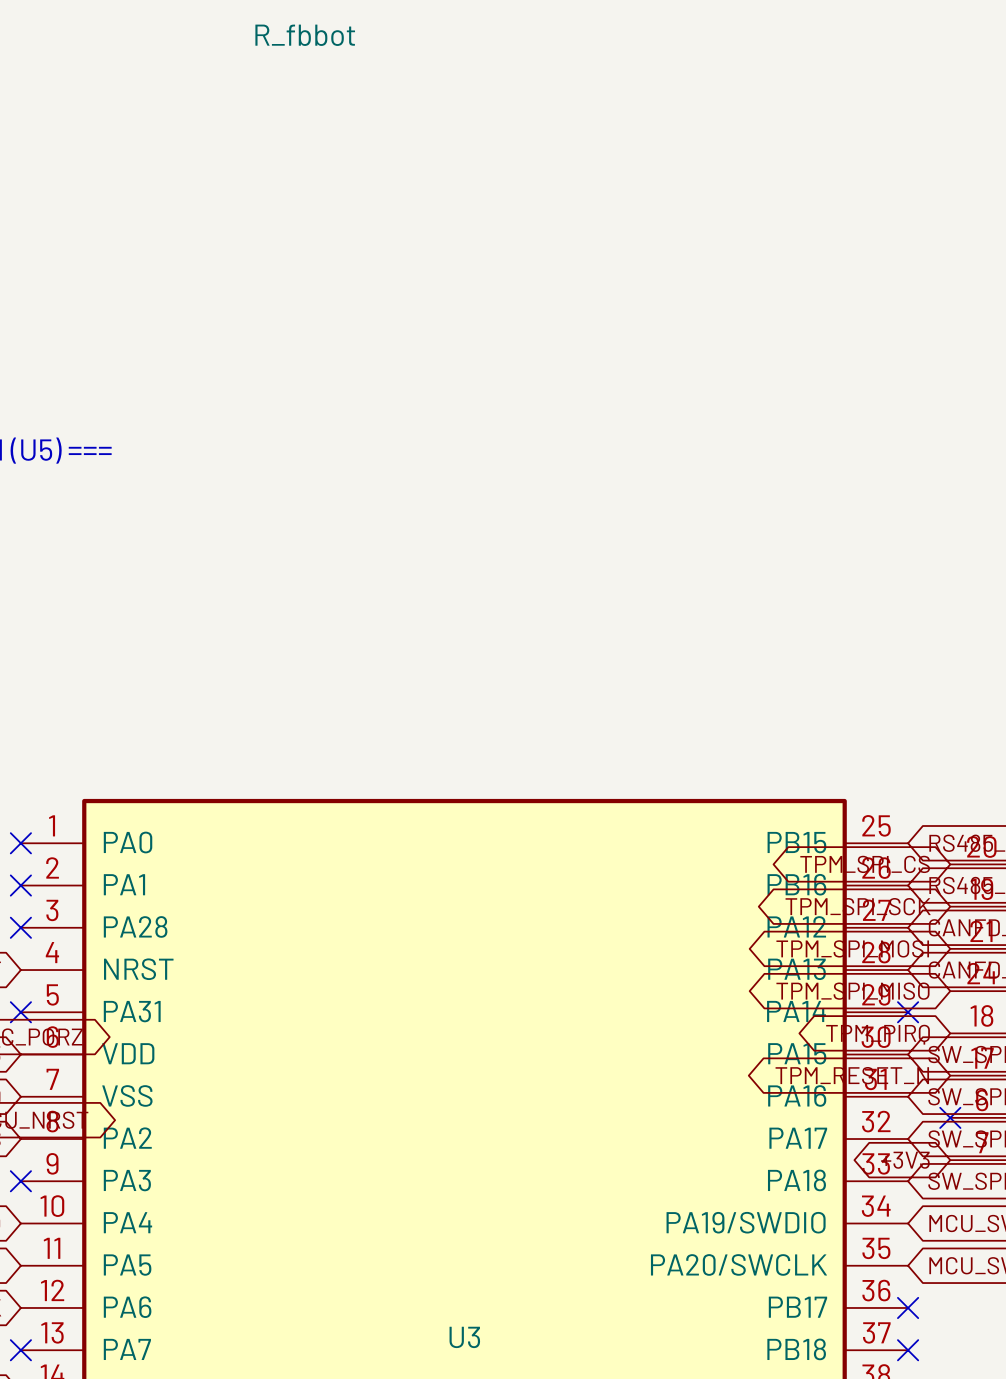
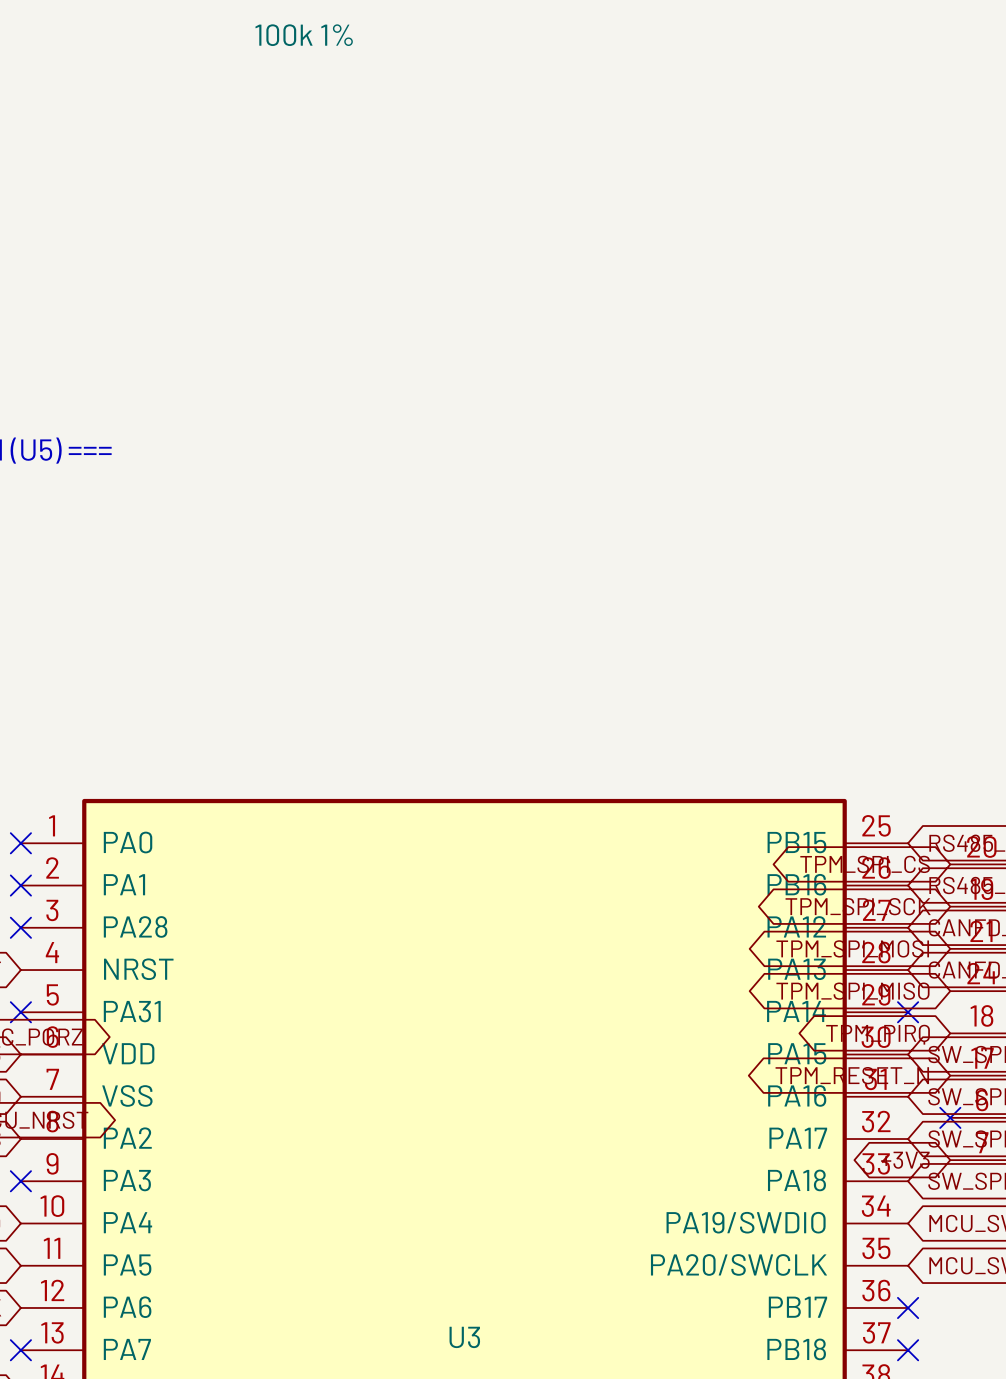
part value: R_fbbot (305, 35) -> 100k 1% (304, 35)

